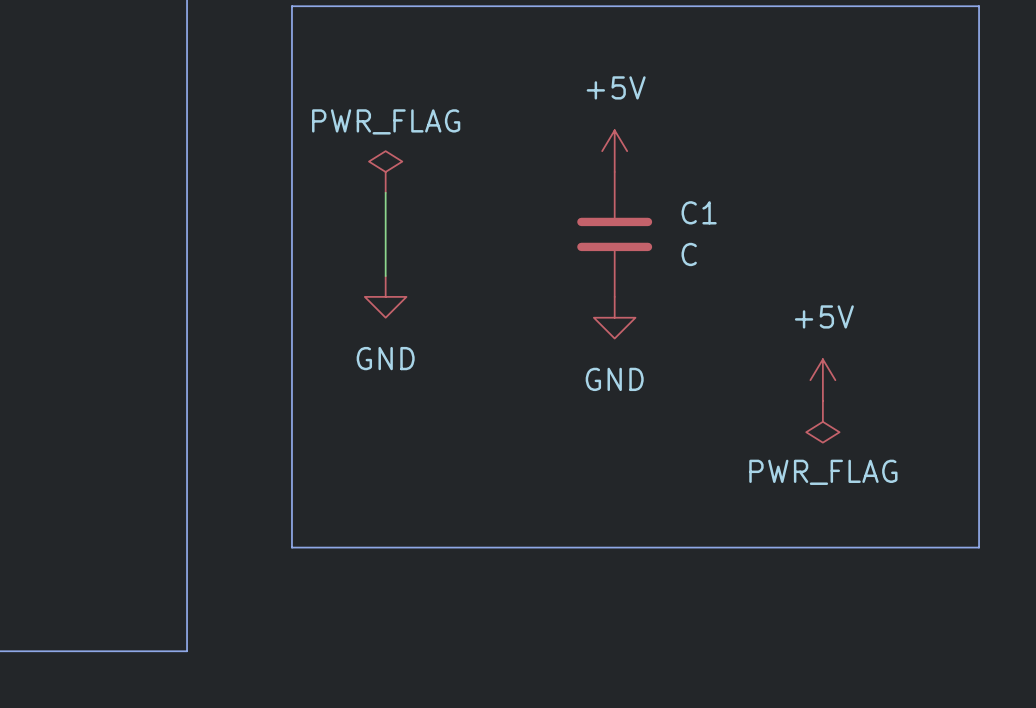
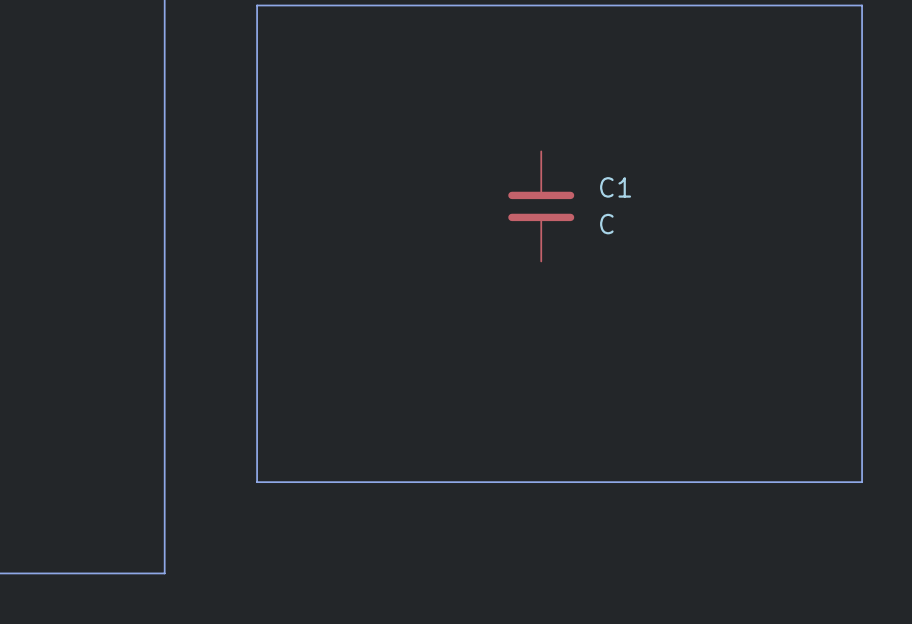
power symbol: +5V (614, 151) -> none
power symbol: PWR_FLAG (385, 171) -> none
wire: (385, 192) (385, 276) -> none
power symbol: GND (385, 296) -> none
power symbol: GND (614, 317) -> none
power symbol: +5V (822, 380) -> none
power symbol: PWR_FLAG (822, 421) -> none

